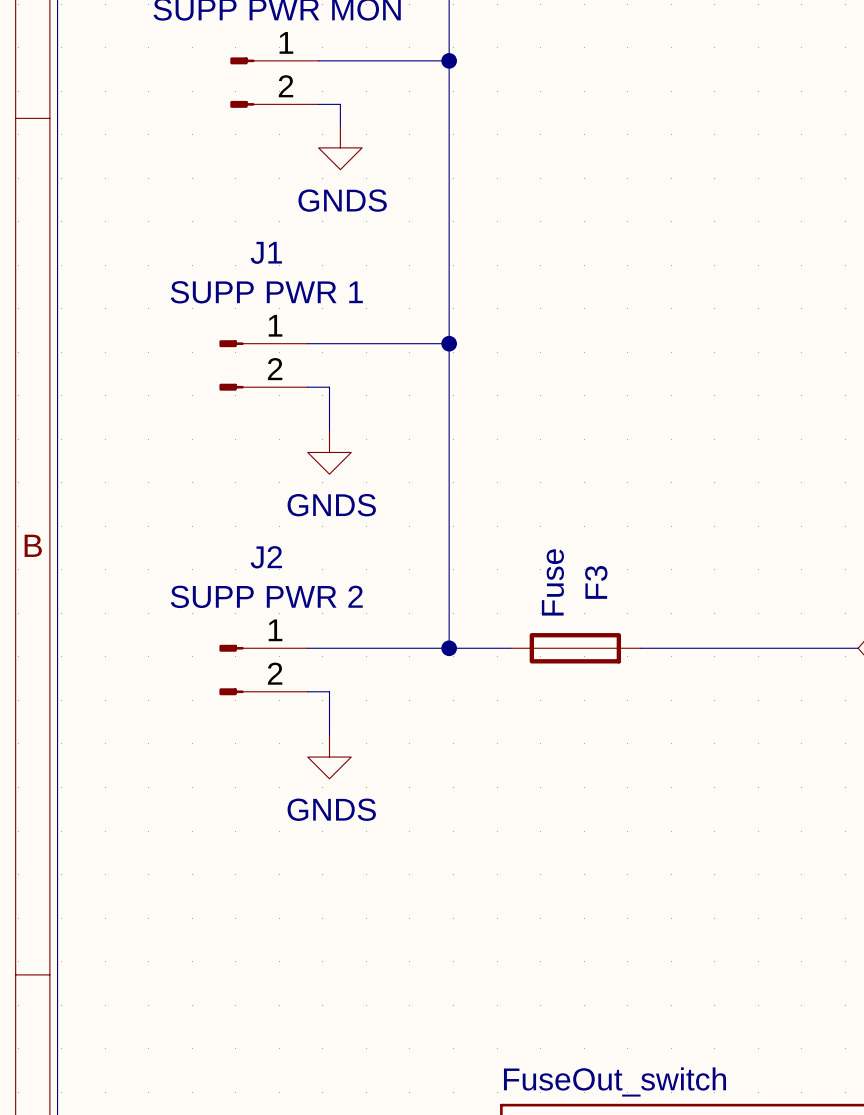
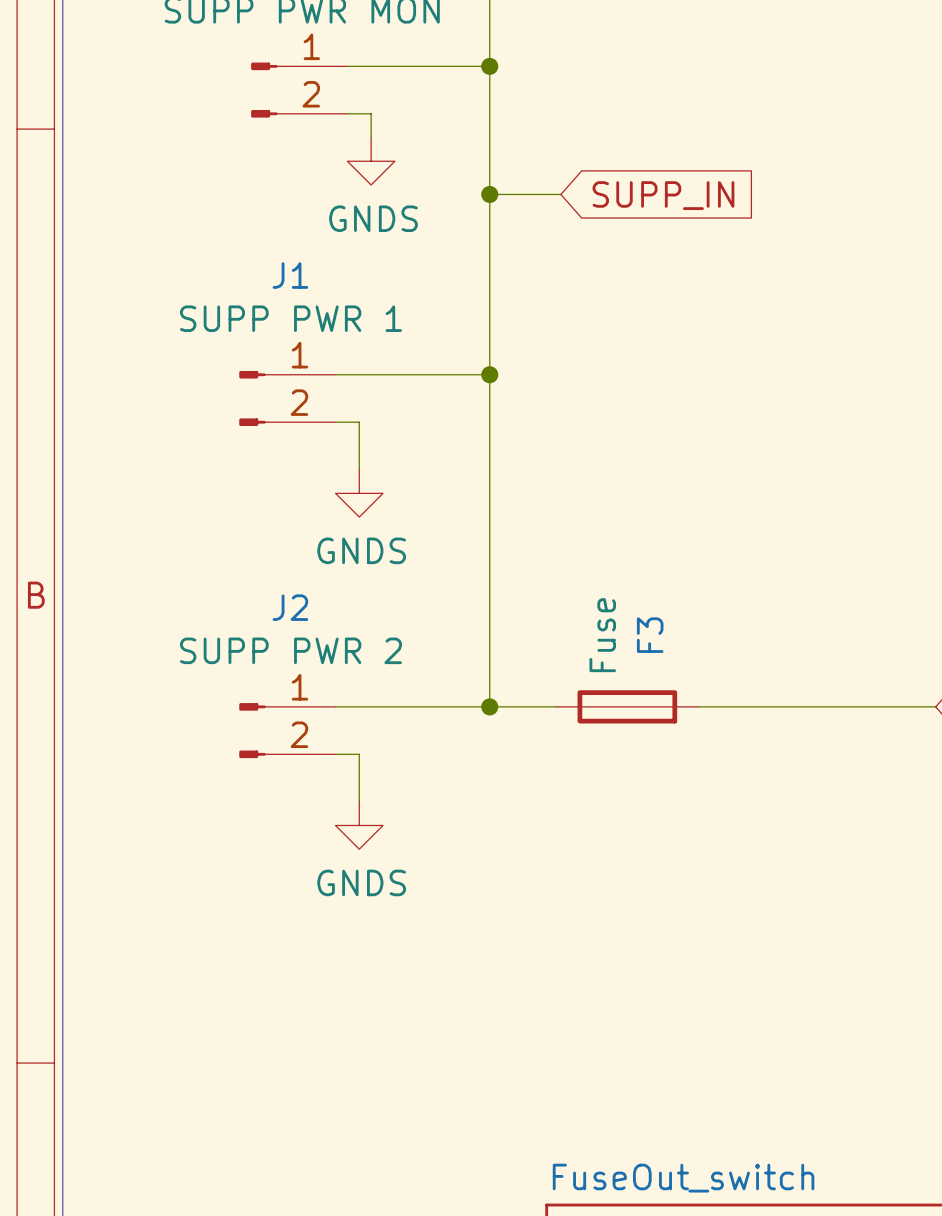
wire: none -> (489, 194) (560, 194)
junction: none -> (489, 194)
global label: none -> SUPP_IN (663, 195)

